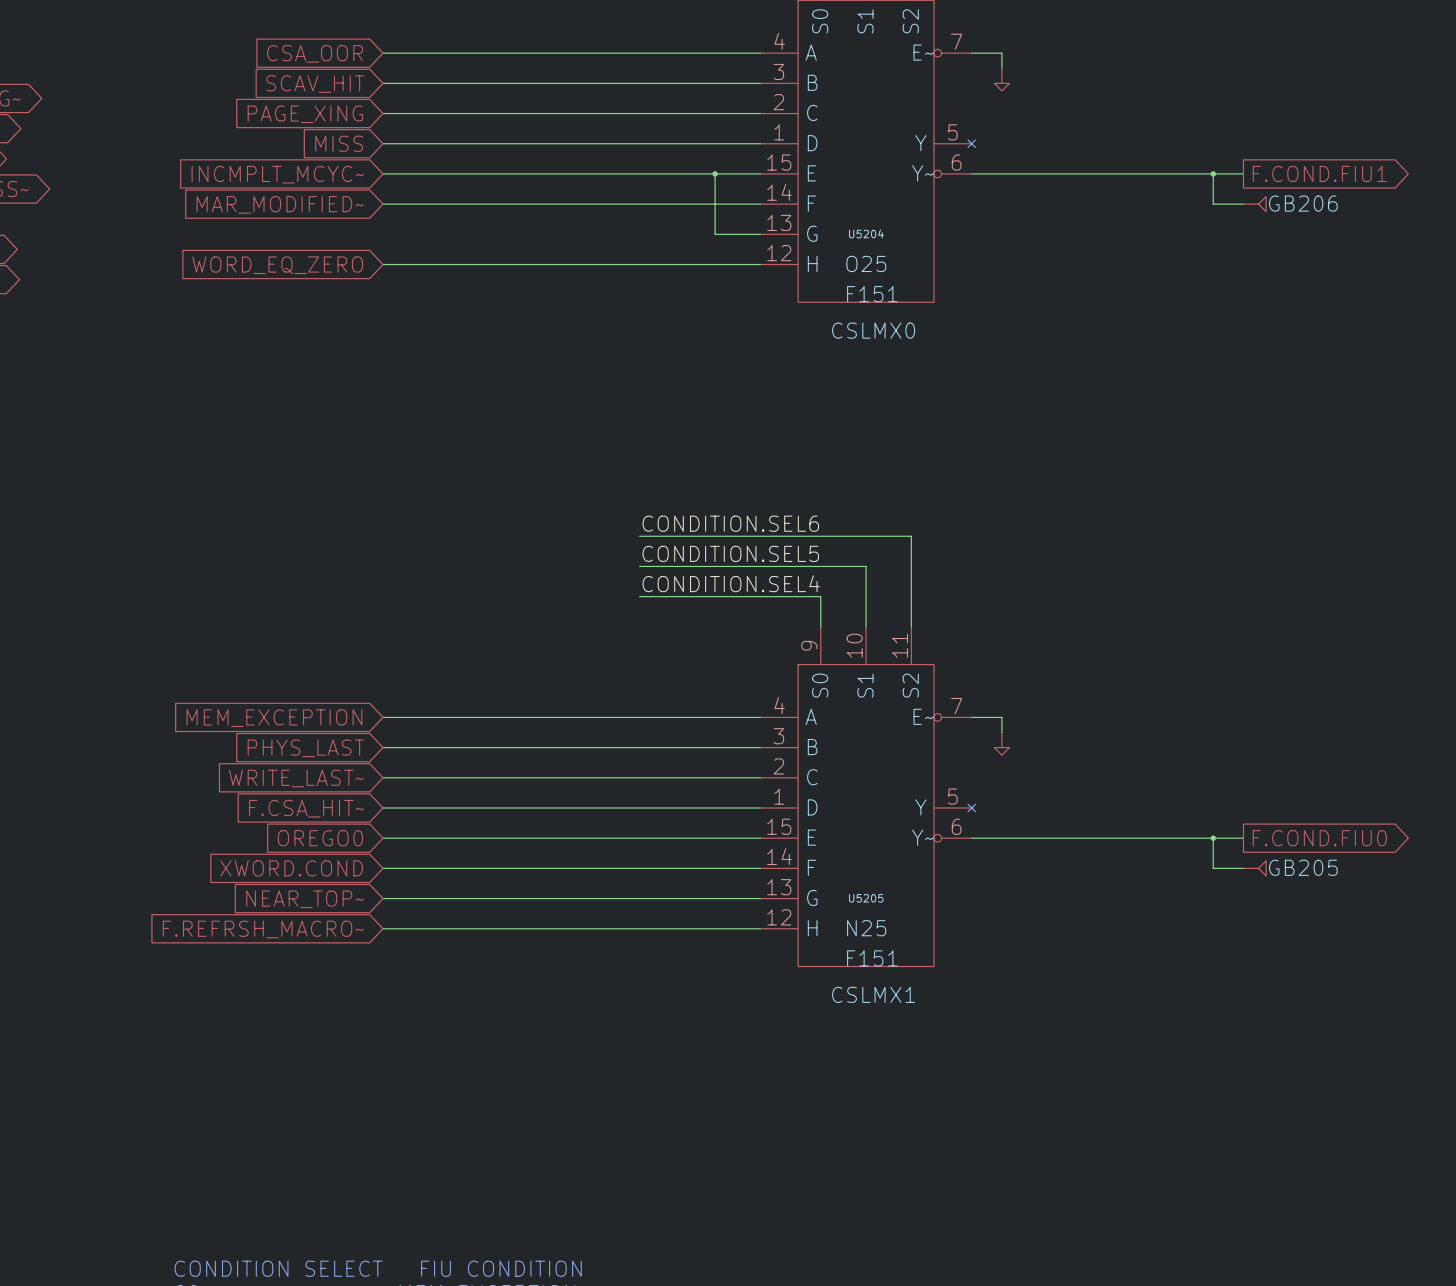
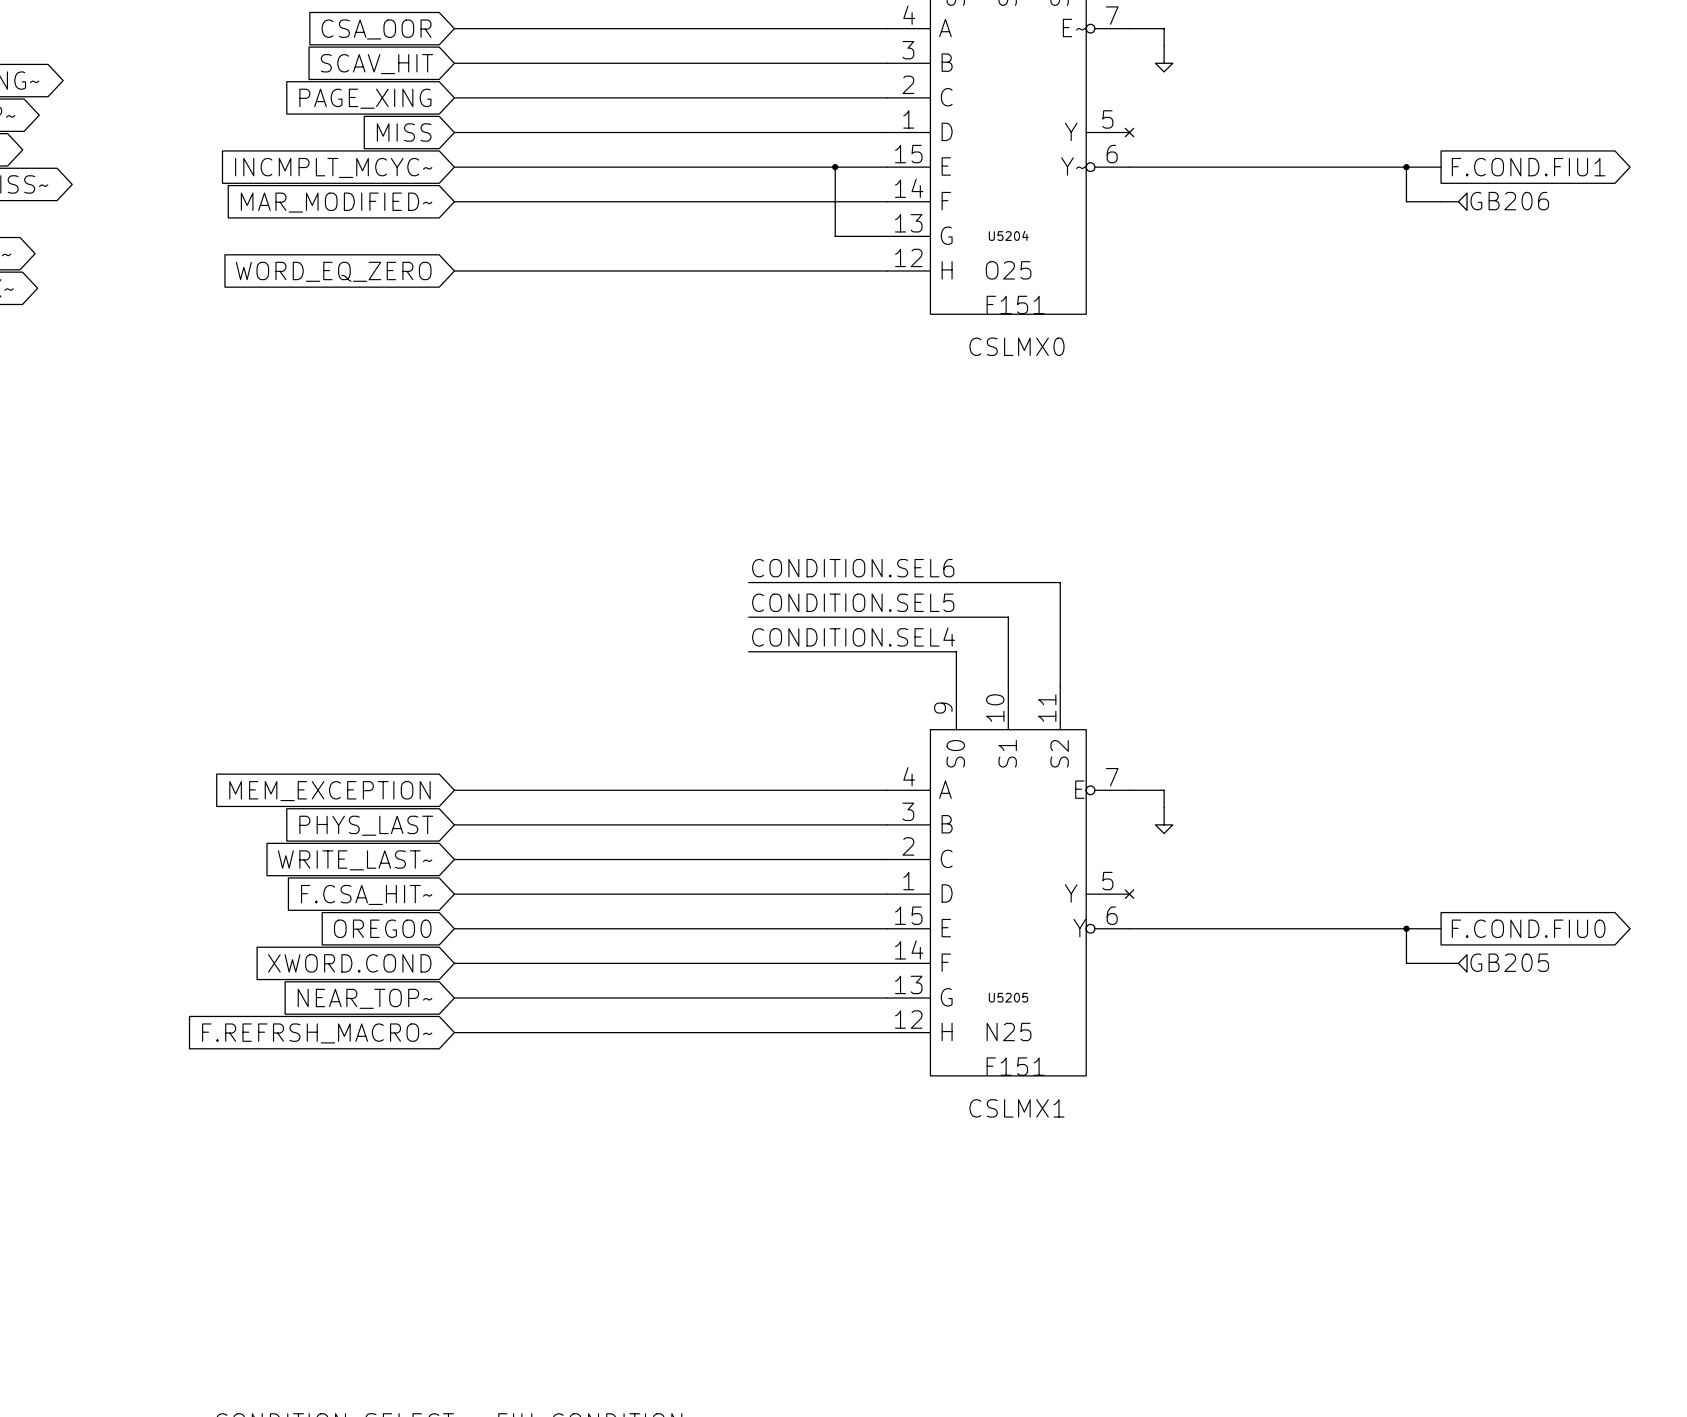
U5205 pin name: E~ (923, 716) -> E (1079, 789)
U5205 pin name: Y~ (922, 837) -> Y (1079, 928)

